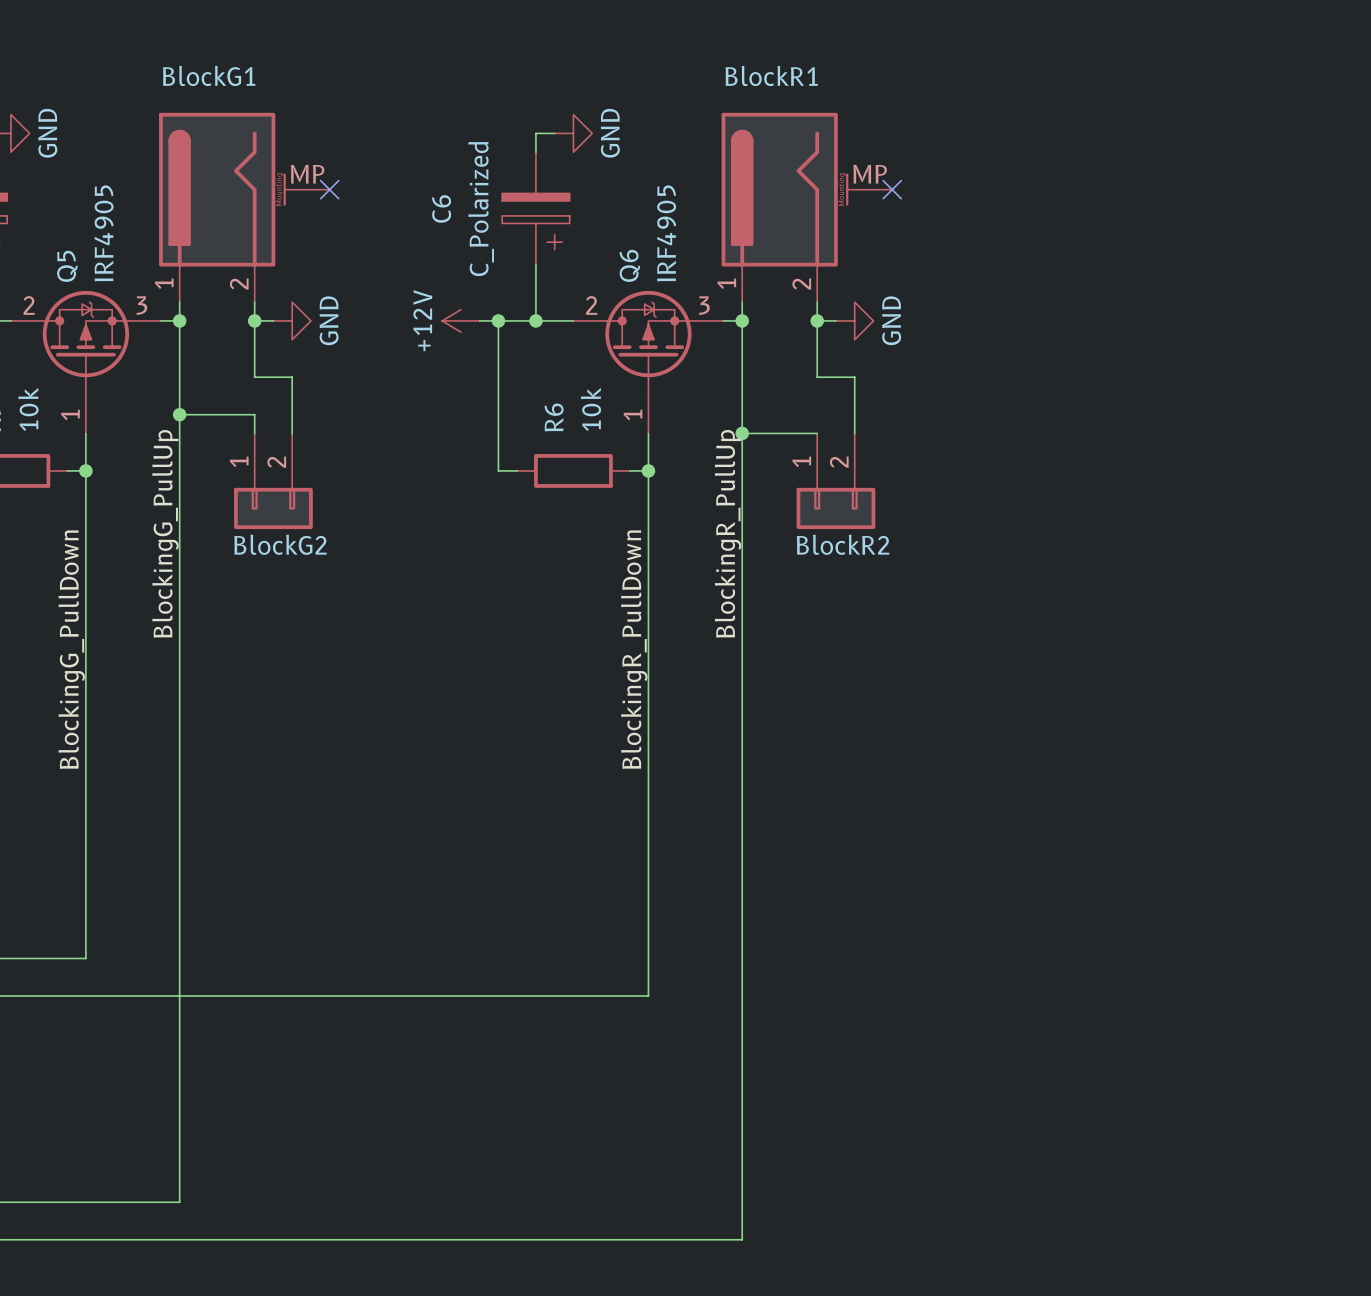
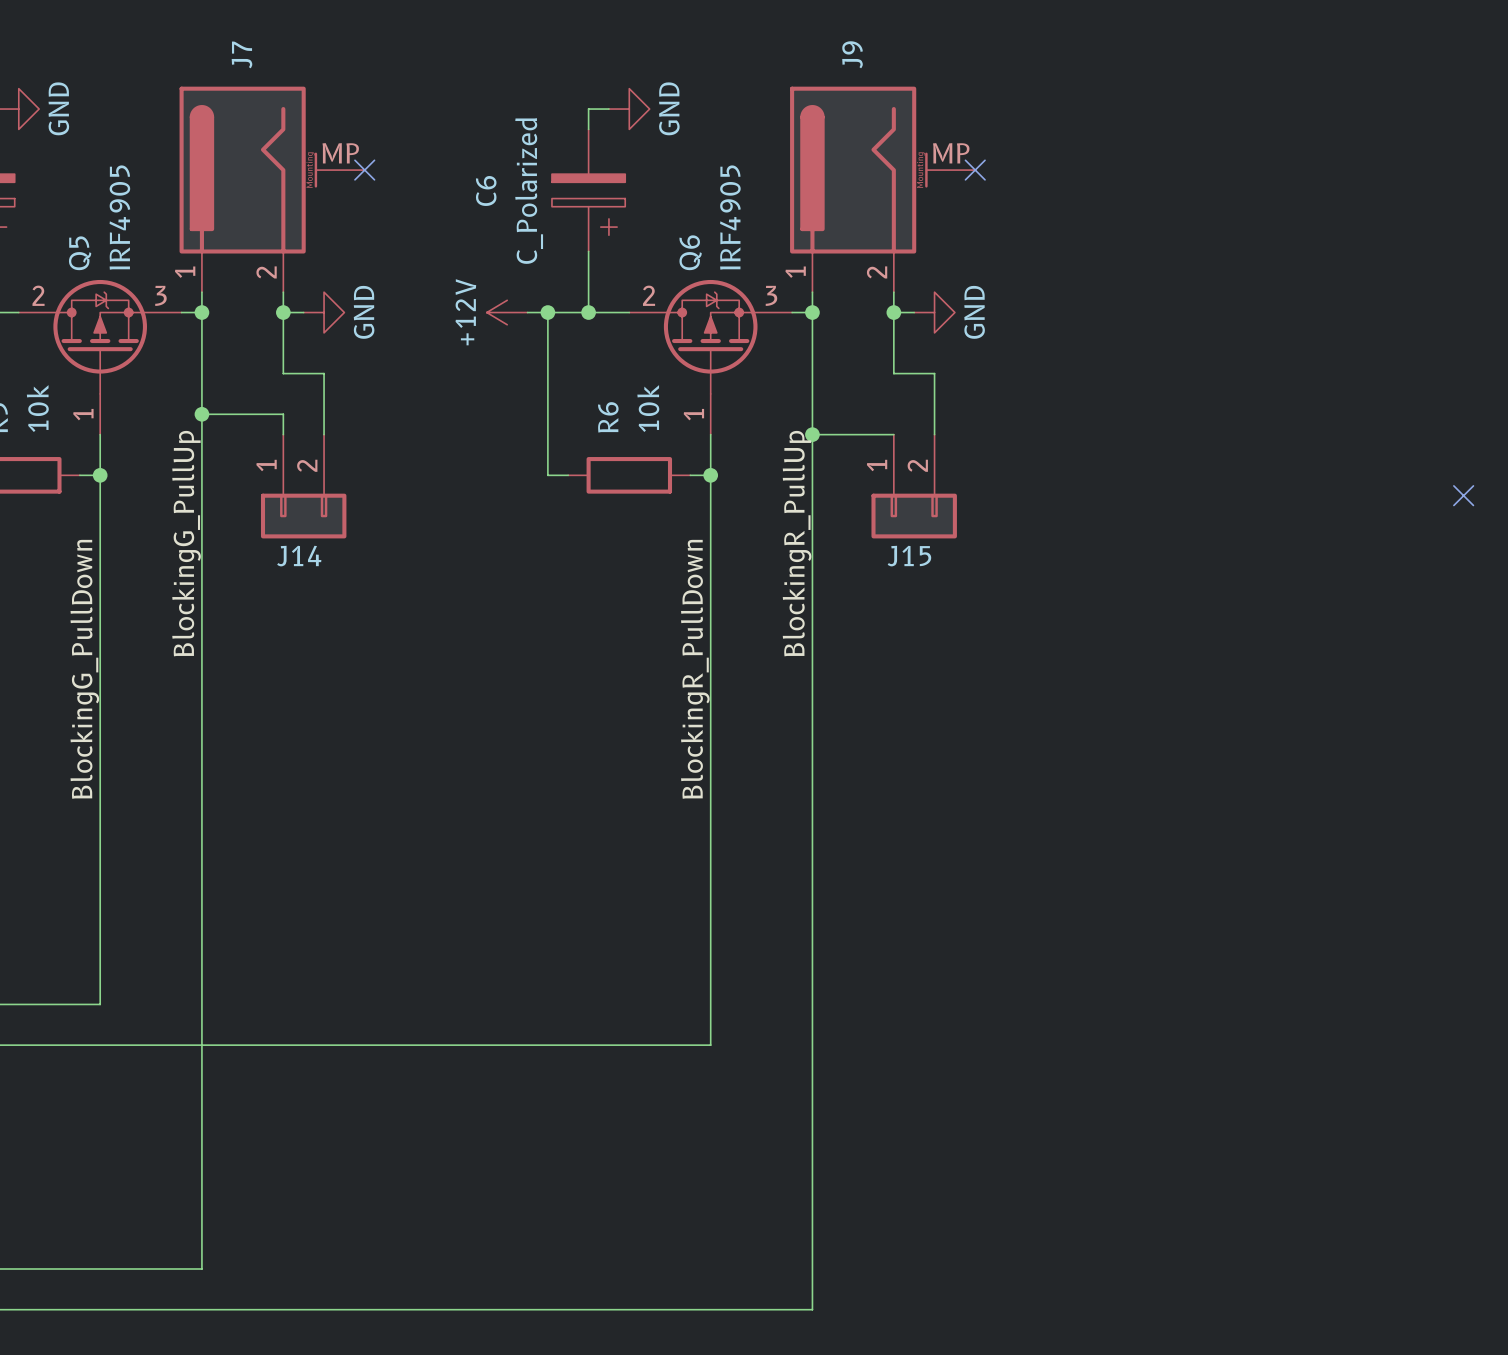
BlockG1 name: BlockG1 (209, 75) -> J7 (241, 54)
BlockR1 name: BlockR1 (771, 75) -> J9 (852, 54)
no-connect mark: none -> (1463, 495)
BlockG2 name: BlockG2 (280, 544) -> J14 (299, 556)
BlockR2 name: BlockR2 (842, 544) -> J15 (909, 556)

